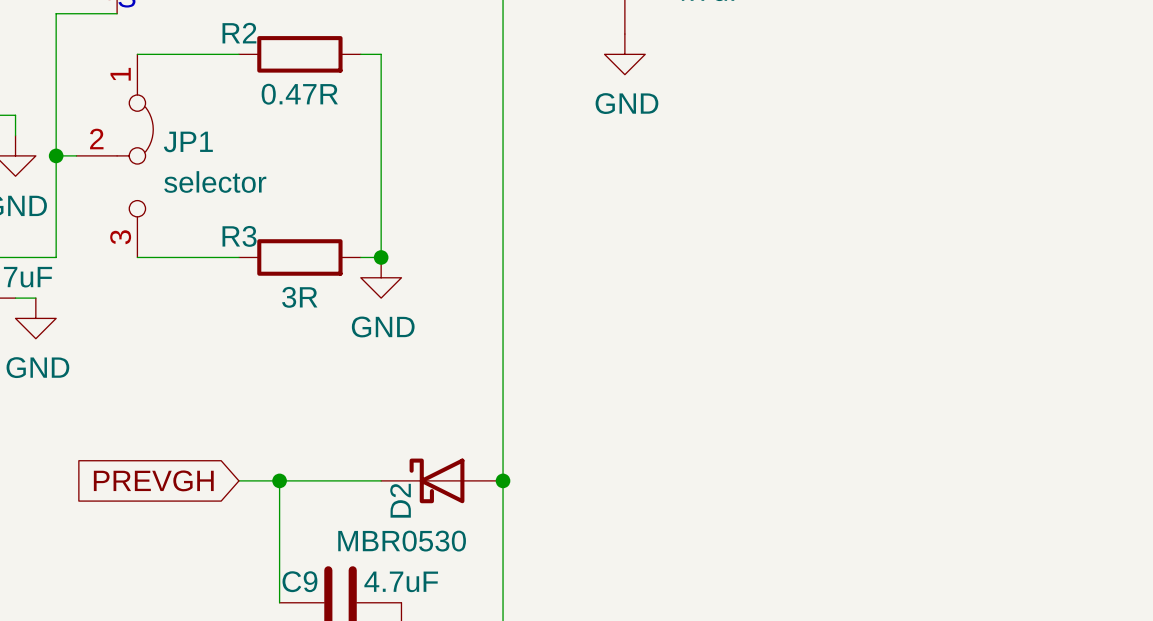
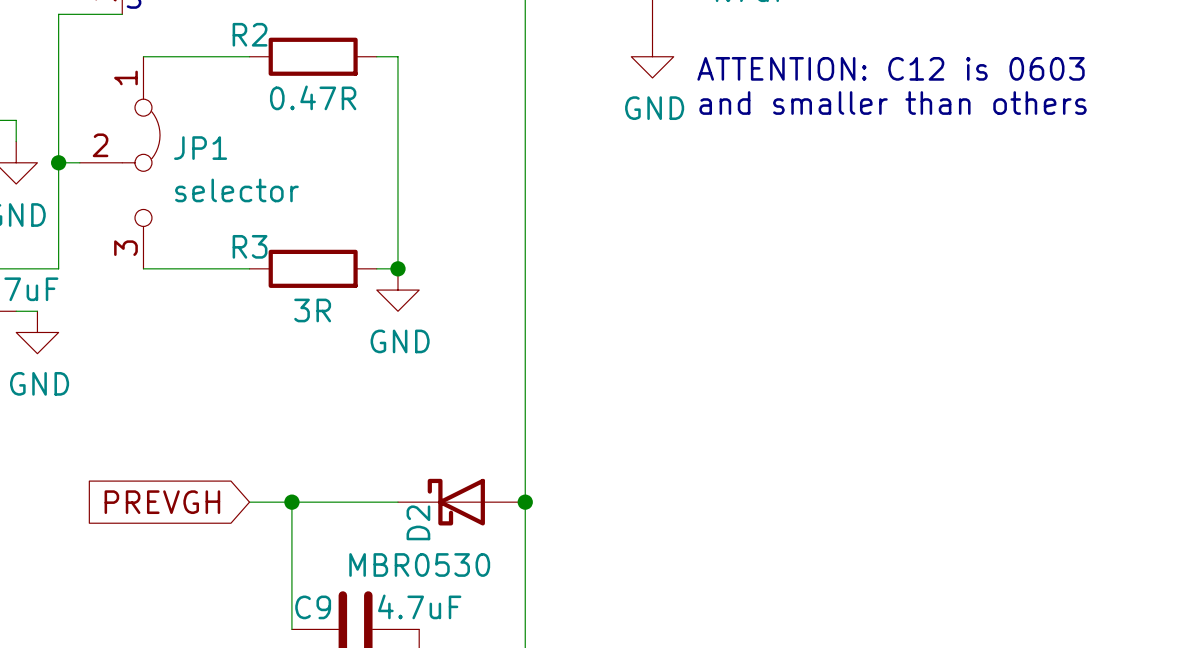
text: none -> ATTENTION: C12 is 0603 (891, 68)
text: none -> and smaller than others (893, 103)

